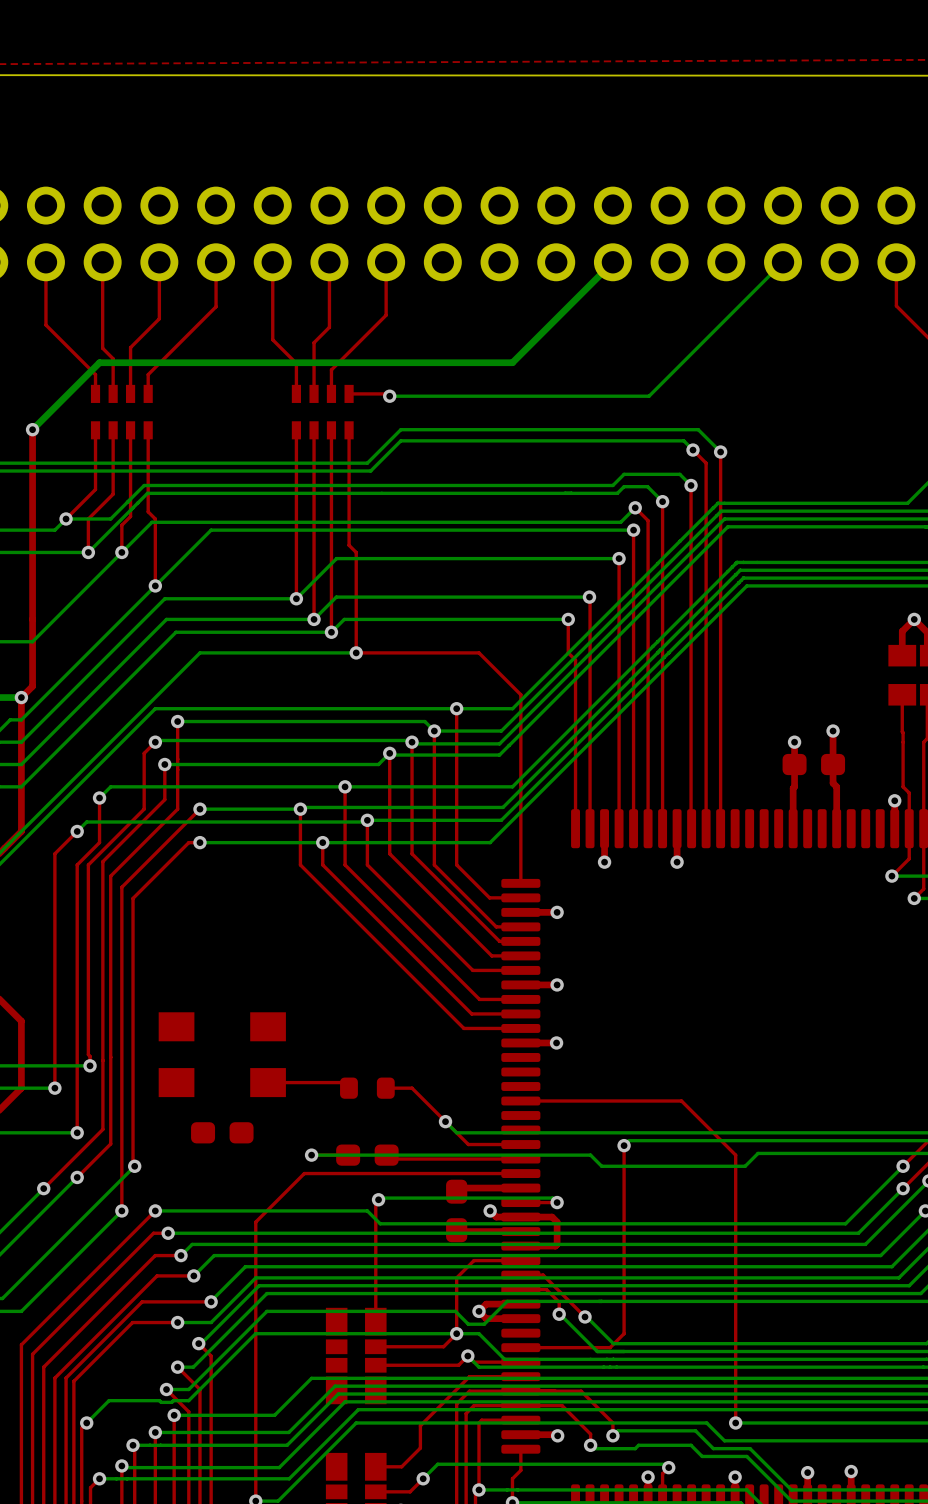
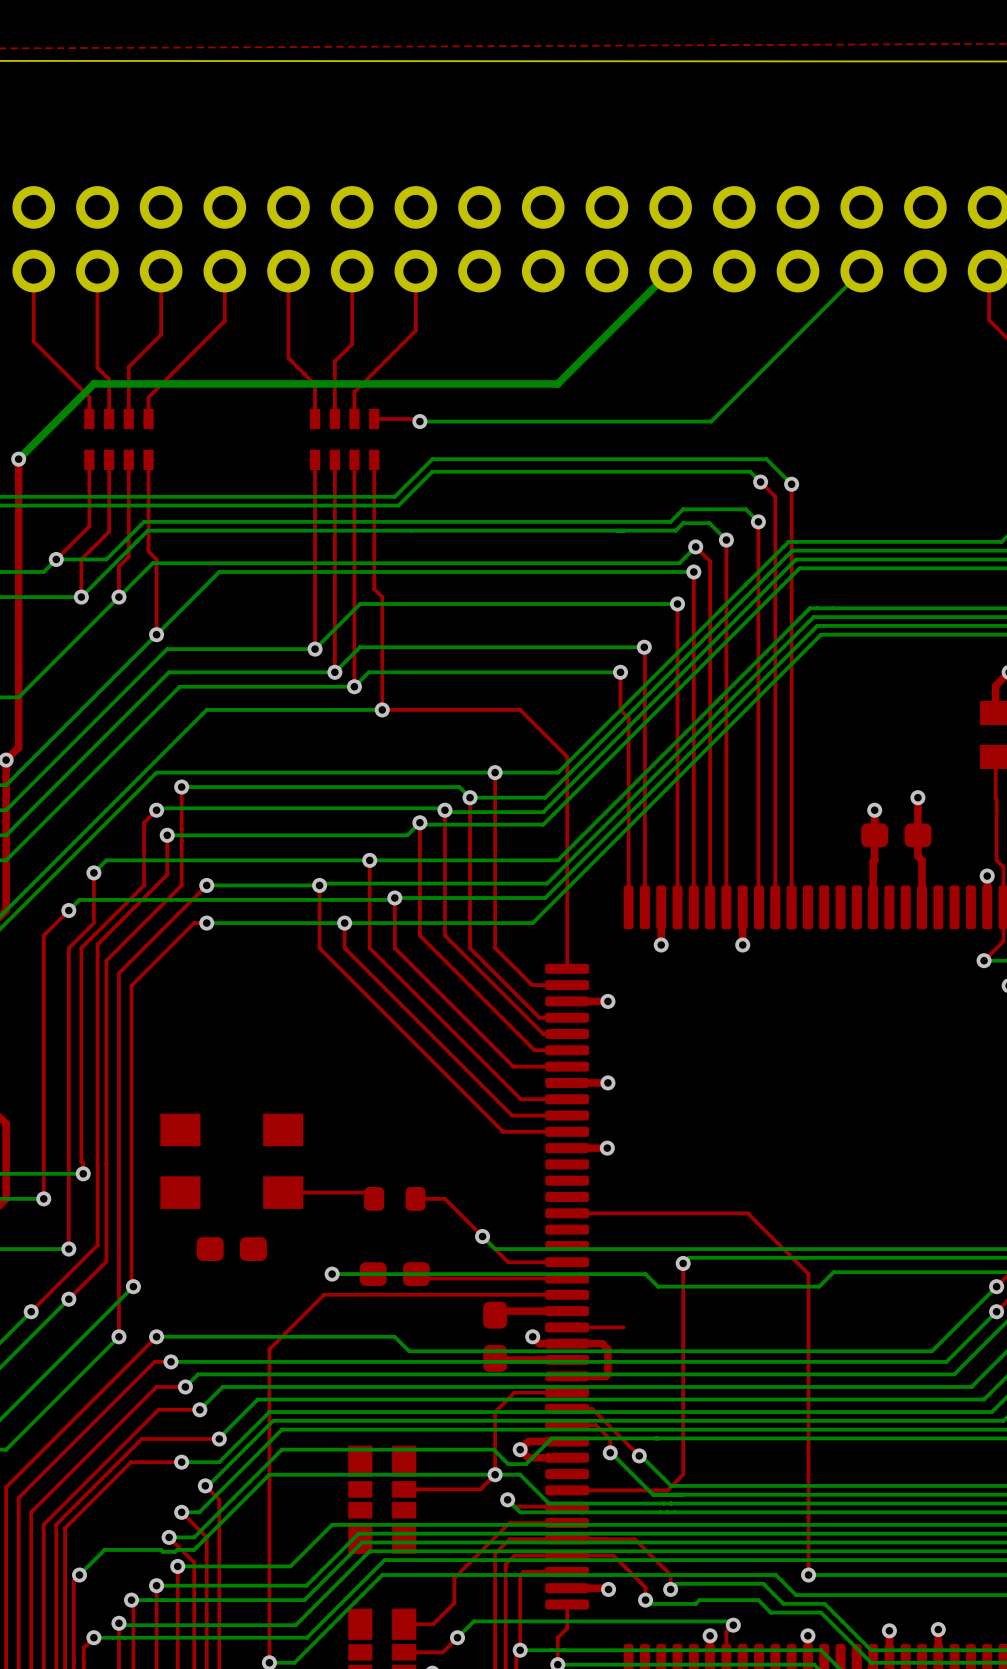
top track: (378, 1199) (375, 1202) (375, 1321) -> none
bottom track: (378, 1199) (380, 1198) (552, 1198) (557, 1202) -> none
via: (378, 1199) -> none
via: (557, 1202) -> none
top track: none -> (623, 1327) (607, 1327)
top track: (467, 1356) (458, 1365) (375, 1365) -> none

